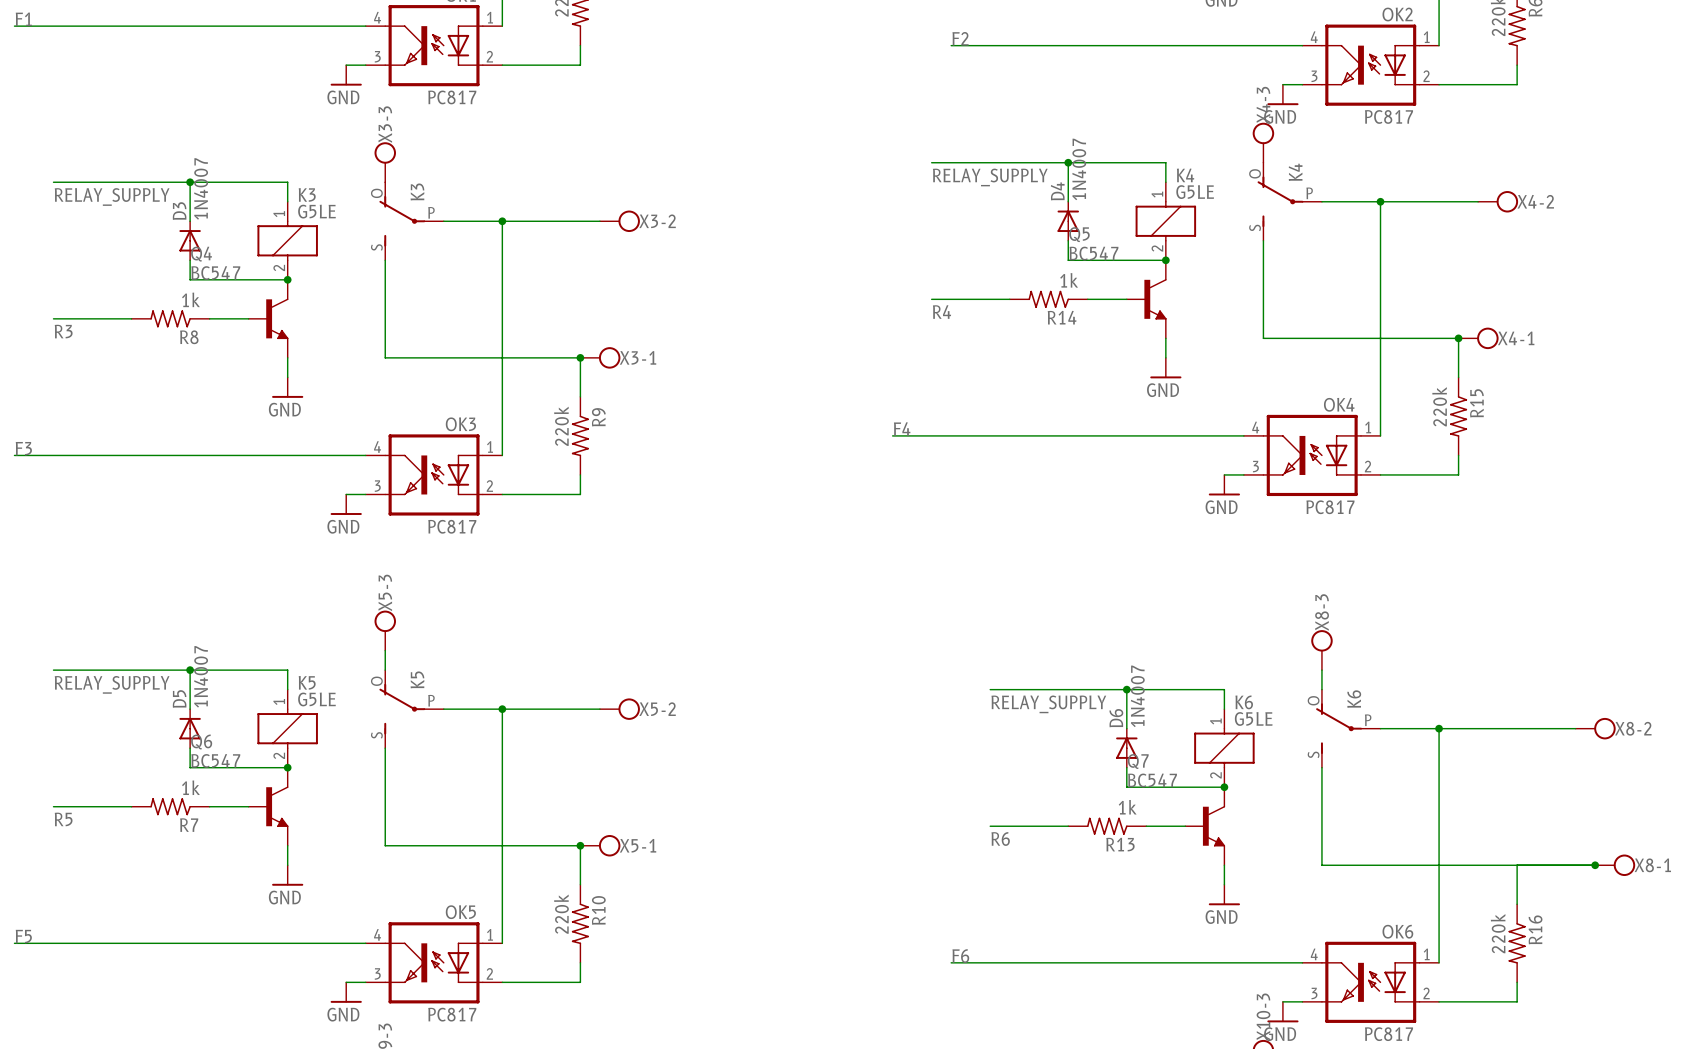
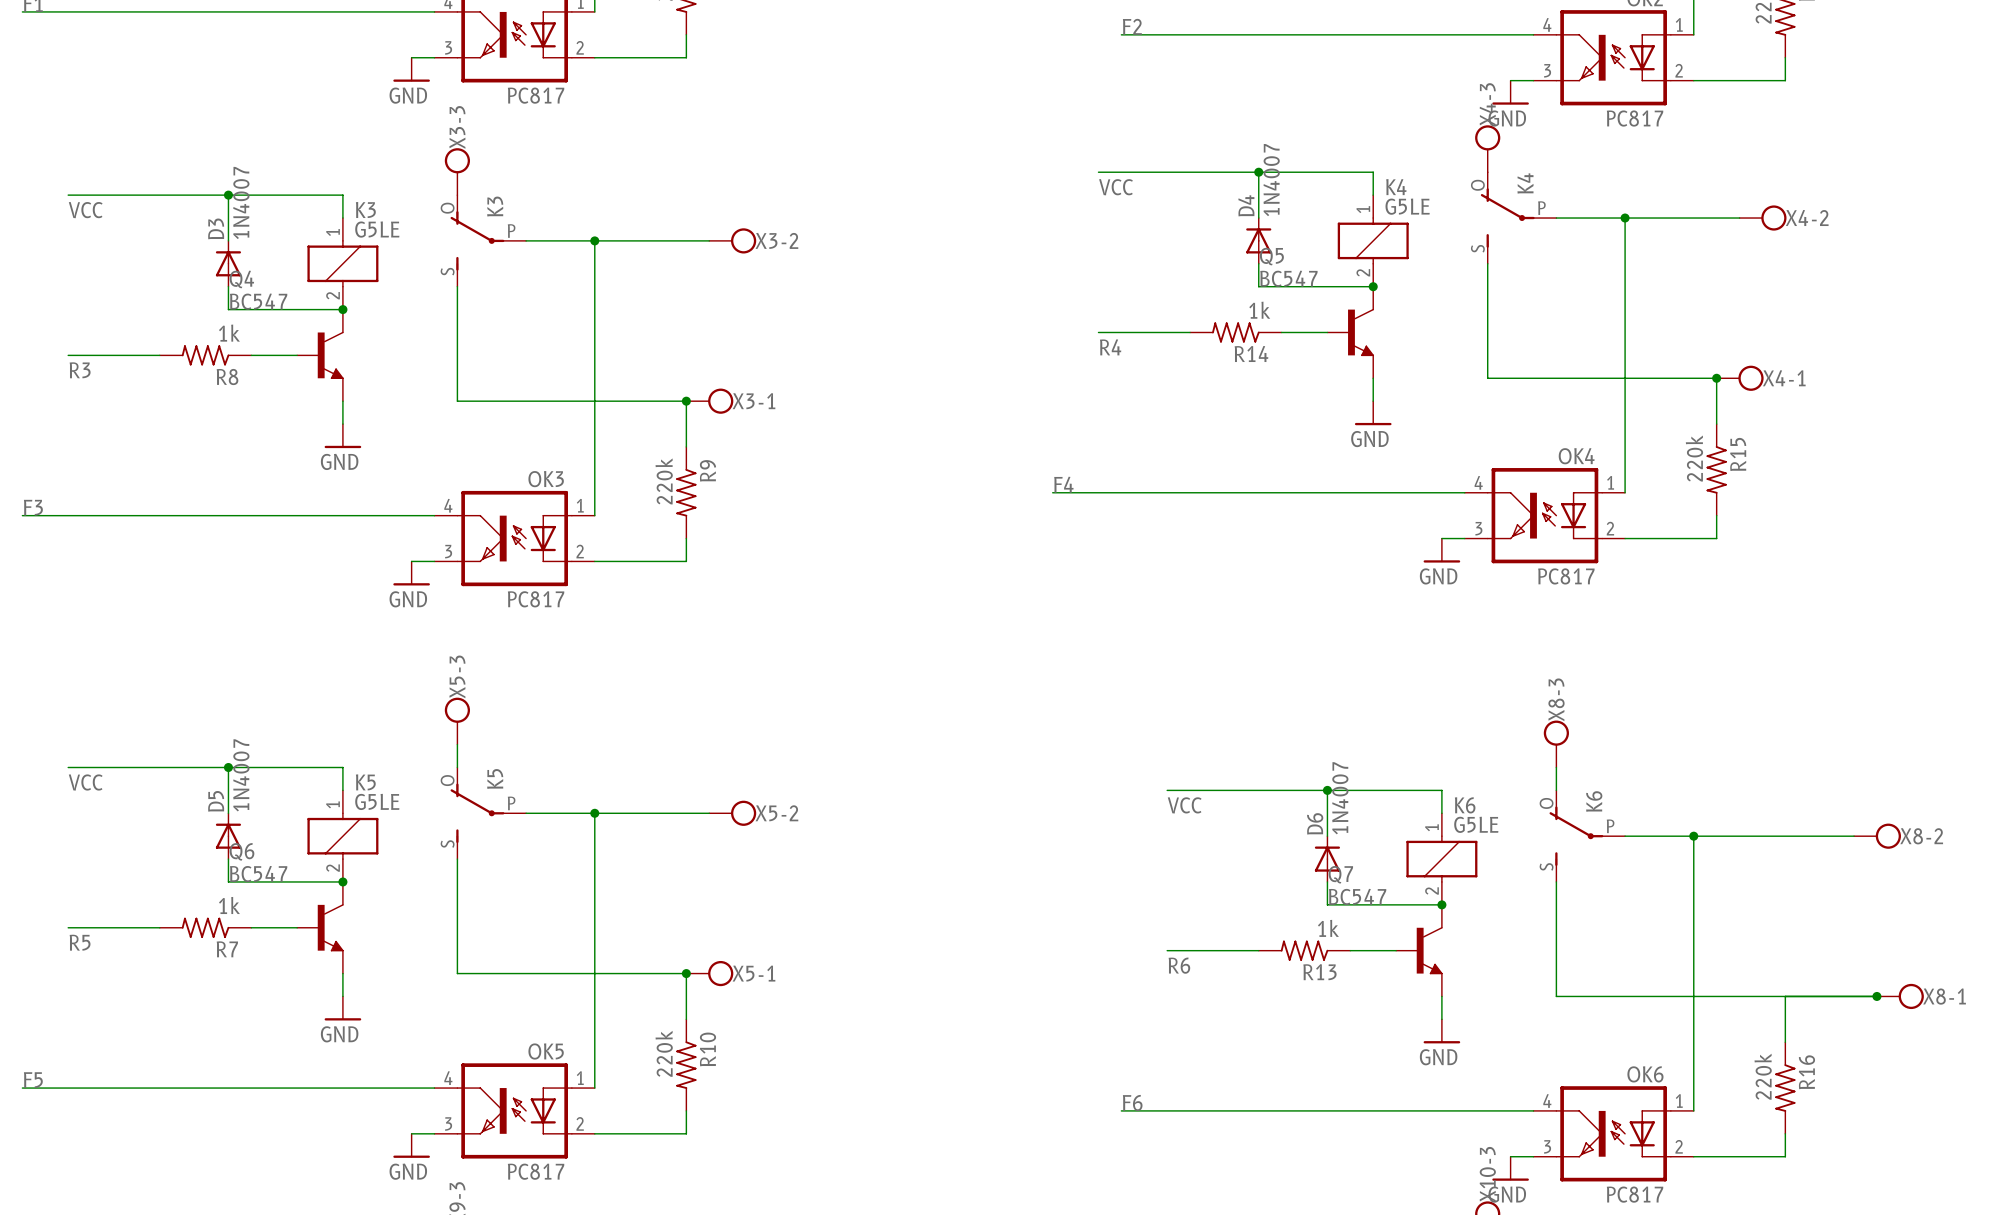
label: RELAY_SUPPLY (990, 177) -> VCC (1115, 187)
label: RELAY_SUPPLY (112, 196) -> VCC (85, 210)
label: RELAY_SUPPLY (112, 684) -> VCC (85, 782)
label: RELAY_SUPPLY (1048, 704) -> VCC (1184, 805)

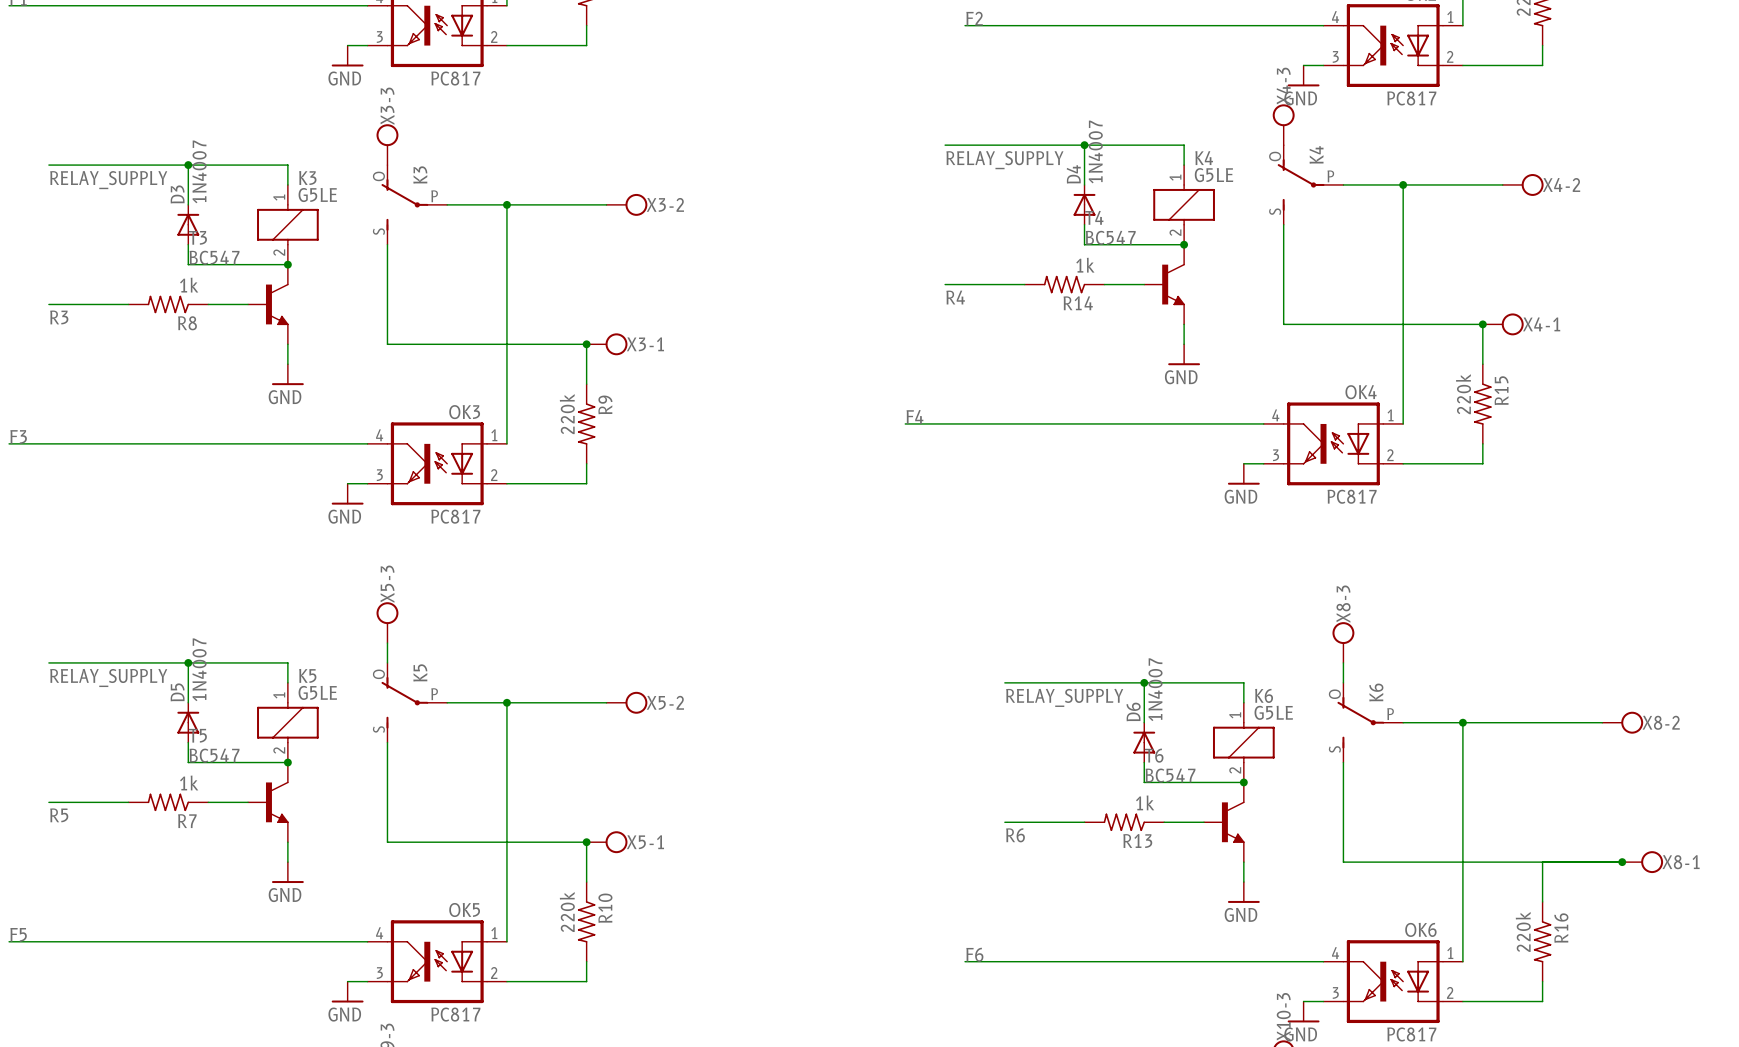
label: VCC (1115, 187) -> RELAY_SUPPLY (1004, 160)
label: VCC (85, 210) -> RELAY_SUPPLY (108, 180)
Q5 name: Q5 (1271, 256) -> T4 (1094, 217)
Q4 name: Q4 (241, 279) -> T3 (197, 237)
label: VCC (85, 782) -> RELAY_SUPPLY (108, 677)
label: VCC (1184, 805) -> RELAY_SUPPLY (1064, 697)
Q6 name: Q6 (241, 851) -> T5 (197, 735)
Q7 name: Q7 (1340, 874) -> T6 (1154, 755)

